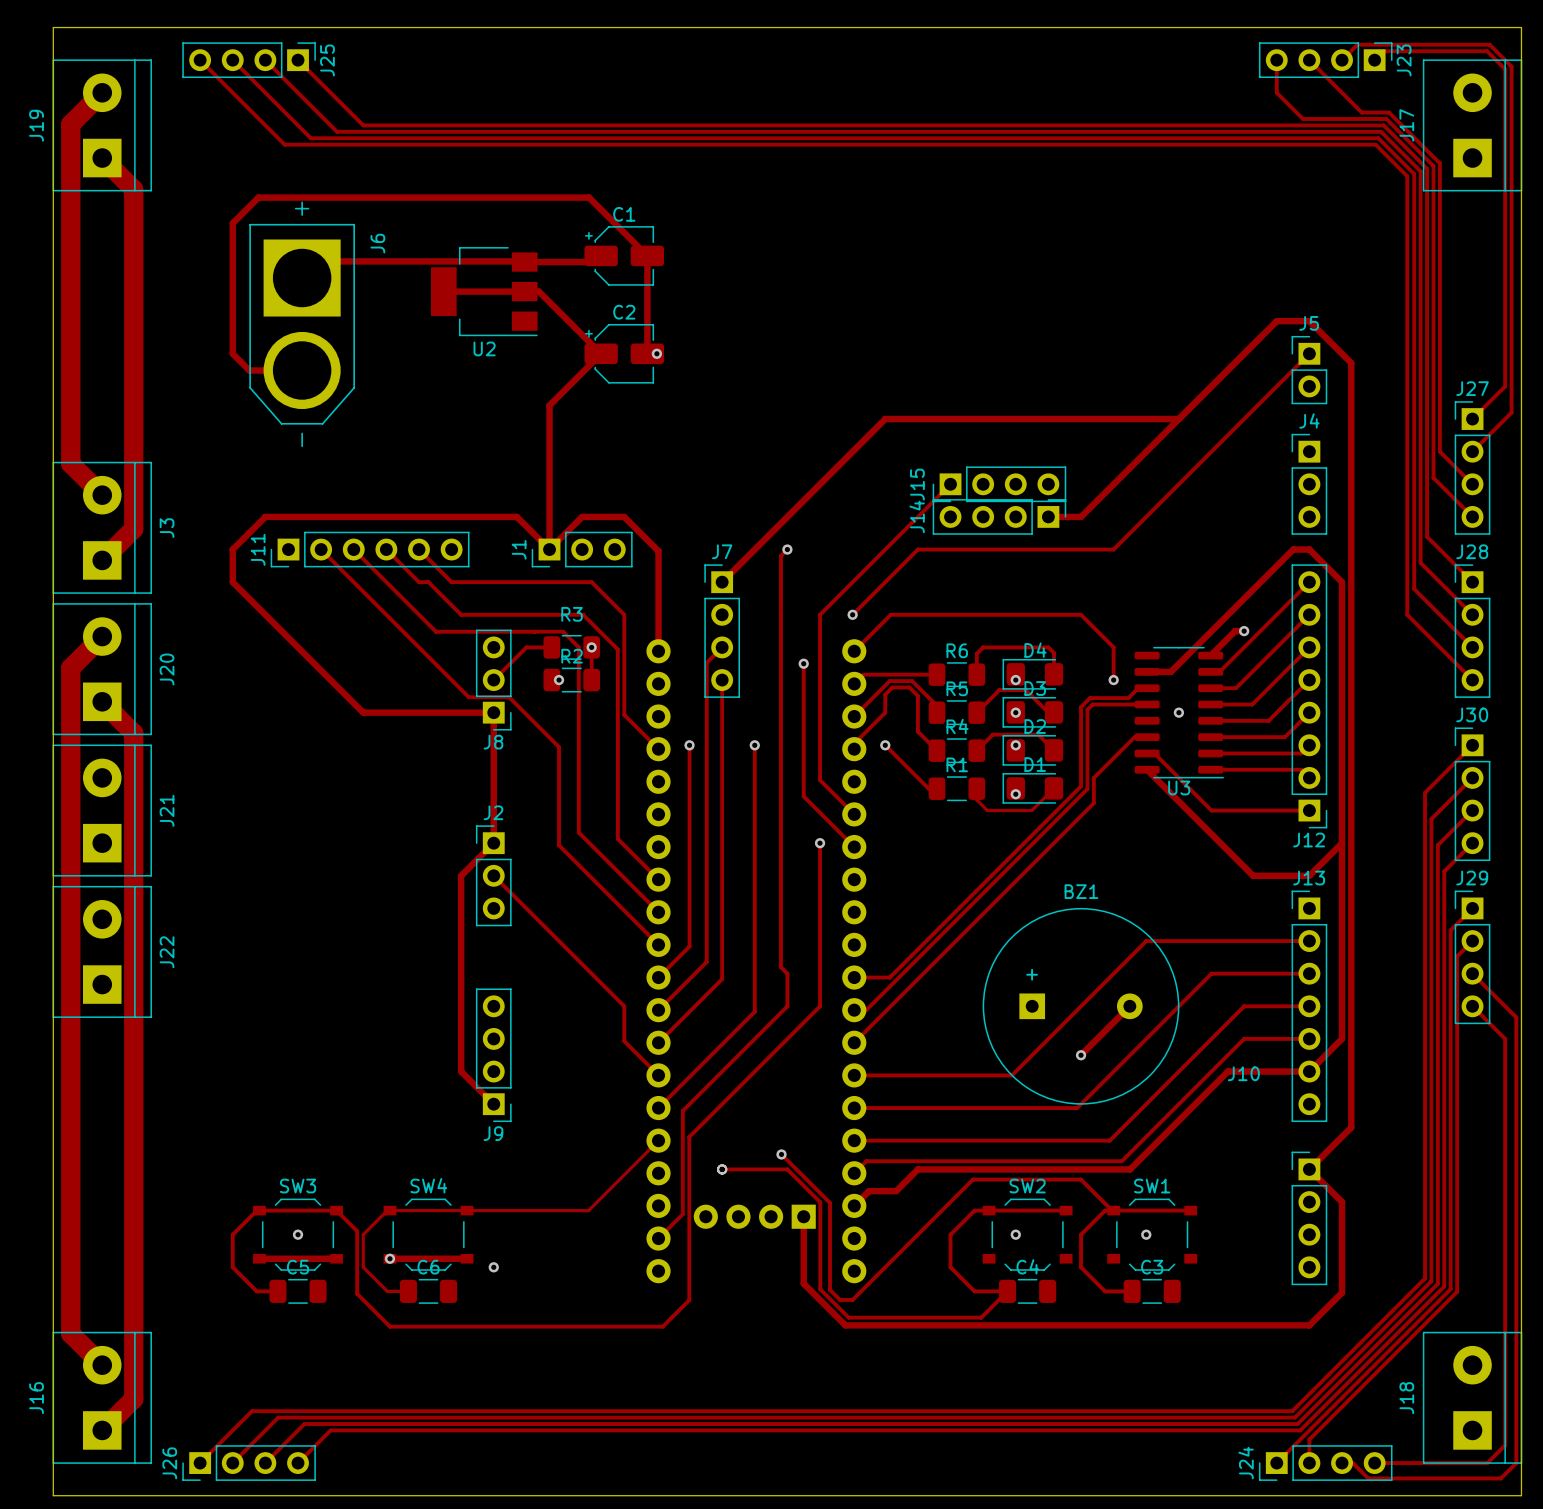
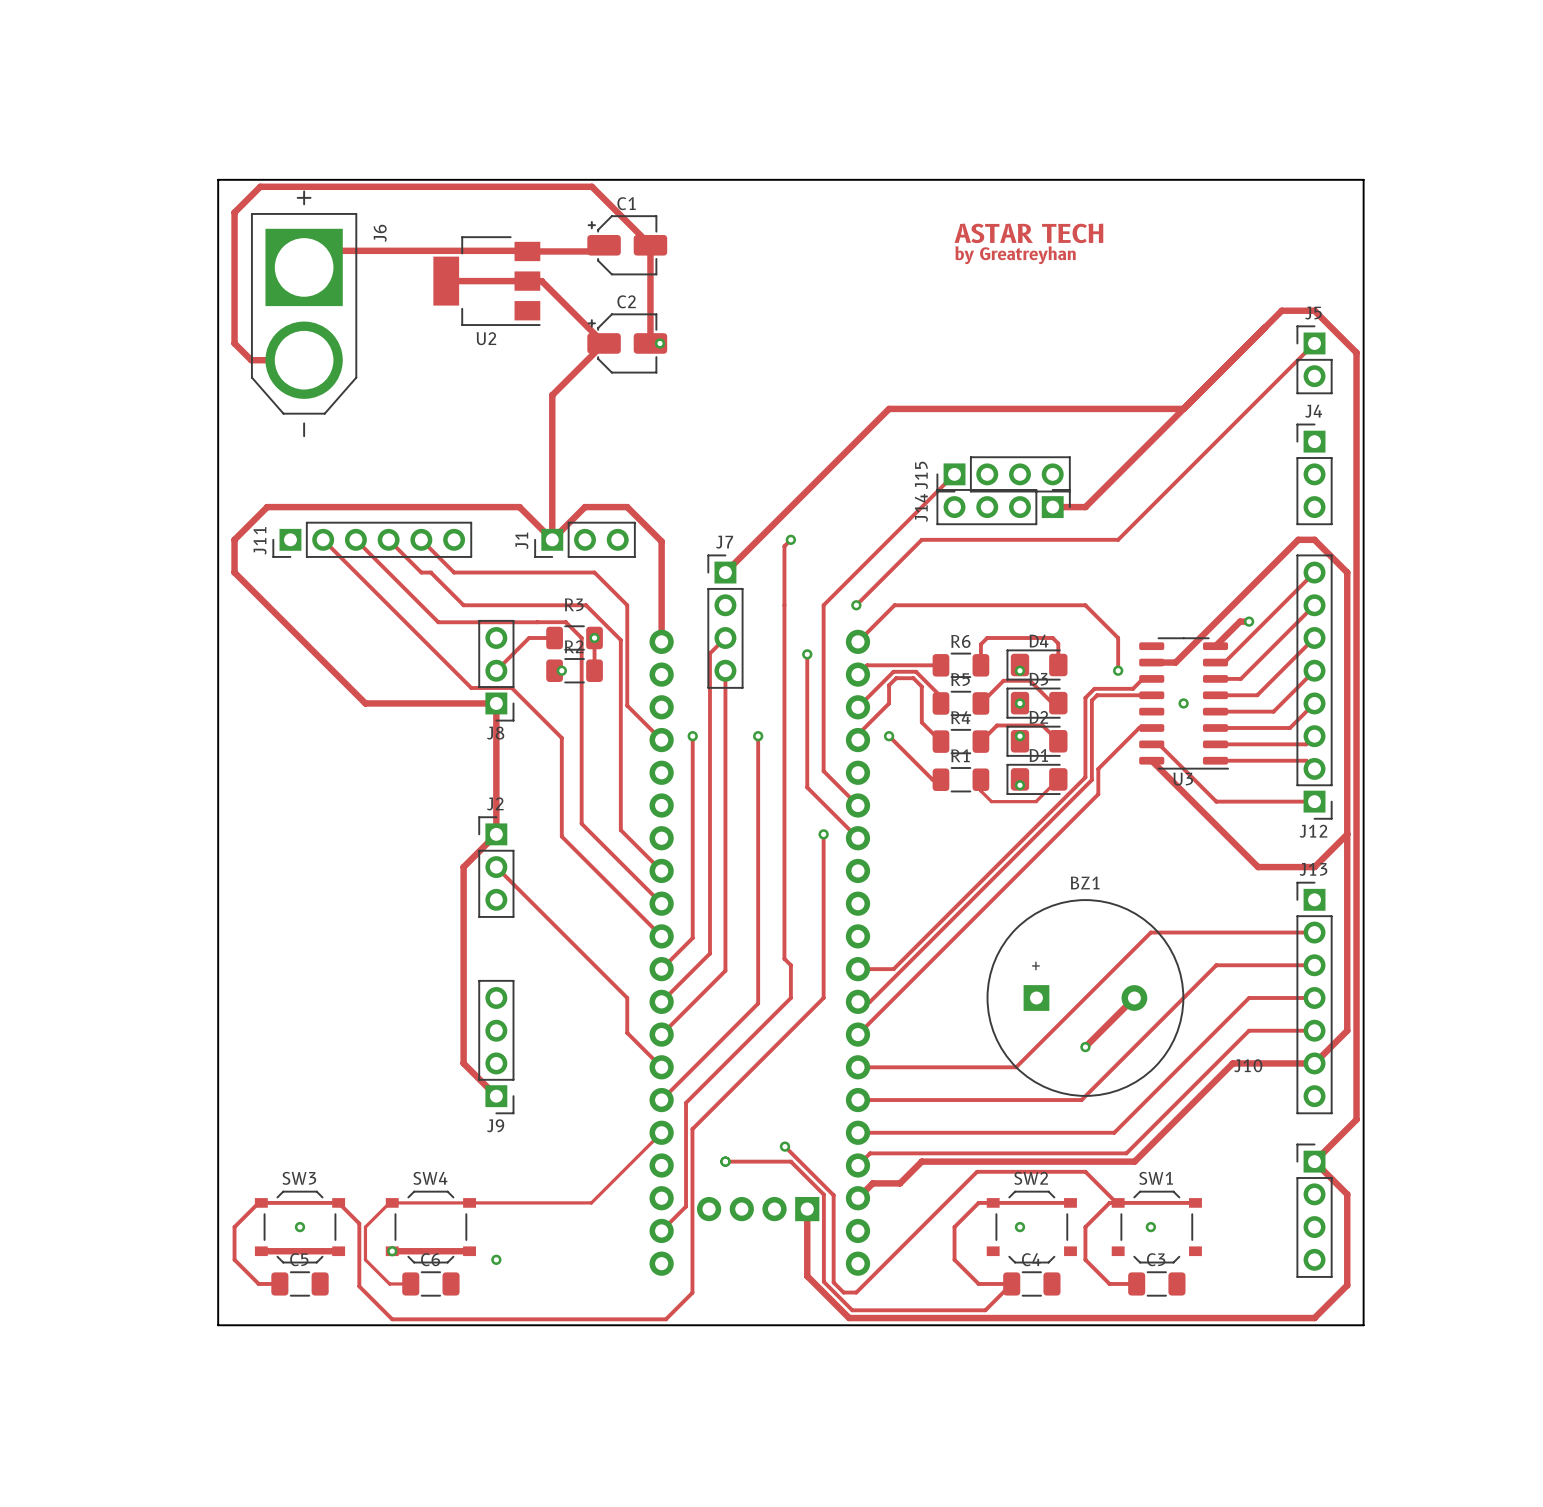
board edge: (53, 27) (1521, 27) (1521, 1495) (53, 1495) (53, 27) -> (218, 179) (218, 1325) (1363, 1325) (1363, 179) (218, 179)
track: (200, 60) (284, 144) (1375, 144) (1407, 176) (1407, 614) (1472, 680) -> none
track: (232, 60) (310, 138) (1378, 138) (1414, 174) (1414, 589) (1472, 647) -> none
J25: (249, 60) -> none
track: (265, 60) (337, 131) (1381, 131) (1420, 171) (1420, 562) (1472, 614) -> none
track: (298, 60) (363, 125) (1383, 125) (1427, 168) (1427, 536) (1472, 582) -> none
track: (1276, 60) (1276, 92) (1302, 118) (1386, 118) (1433, 166) (1433, 477) (1472, 516) -> none
track: (1309, 60) (1361, 112) (1389, 112) (1439, 163) (1439, 451) (1472, 484) -> none
J23: (1325, 60) -> none
track: (1342, 60) (1357, 44) (1489, 44) (1511, 66) (1511, 412) (1472, 451) -> none
track: (1374, 60) (1383, 51) (1487, 51) (1505, 69) (1505, 386) (1472, 419) -> none
track: (102, 92) (70, 124) (70, 463) (102, 495) -> none
J19: (102, 125) -> none
J17: (1472, 125) -> none
track: (102, 158) (133, 189) (133, 528) (102, 560) -> none
text: none -> ASTAR TECH (1028, 233)
text: none -> by Greatreyhan (1015, 255)
J27: (1472, 467) -> none
J3: (102, 527) -> none
J28: (1472, 631) -> none
track: (102, 636) (70, 668) (70, 1333) (102, 1365) -> none
J20: (102, 669) -> none
track: (102, 701) (133, 733) (133, 1398) (102, 1430) -> none
track: (1472, 745) (1425, 792) (1425, 1278) (1292, 1411) (252, 1411) (200, 1463) -> none
track: (1472, 777) (1431, 819) (1431, 1281) (1295, 1417) (278, 1417) (232, 1463) -> none
J30: (1472, 794) -> none
J21: (102, 810) -> none
track: (1472, 810) (1437, 845) (1437, 1283) (1297, 1424) (304, 1424) (265, 1463) -> none
track: (1472, 843) (1444, 871) (1444, 1286) (1300, 1430) (330, 1430) (298, 1463) -> none
track: (1472, 908) (1450, 930) (1450, 1289) (1276, 1463) -> none
track: (1472, 941) (1457, 956) (1457, 1291) (1309, 1439) (1309, 1463) -> none
J22: (102, 951) -> none
J29: (1472, 957) -> none
track: (1472, 973) (1516, 1017) (1516, 1463) (1500, 1478) (1368, 1478) (1352, 1463) (1342, 1463) -> none
track: (1472, 1006) (1505, 1038) (1505, 1445) (1487, 1463) (1374, 1463) -> none
J16: (102, 1397) -> none
J18: (1472, 1397) -> none
J26: (249, 1463) -> none
J24: (1325, 1463) -> none

